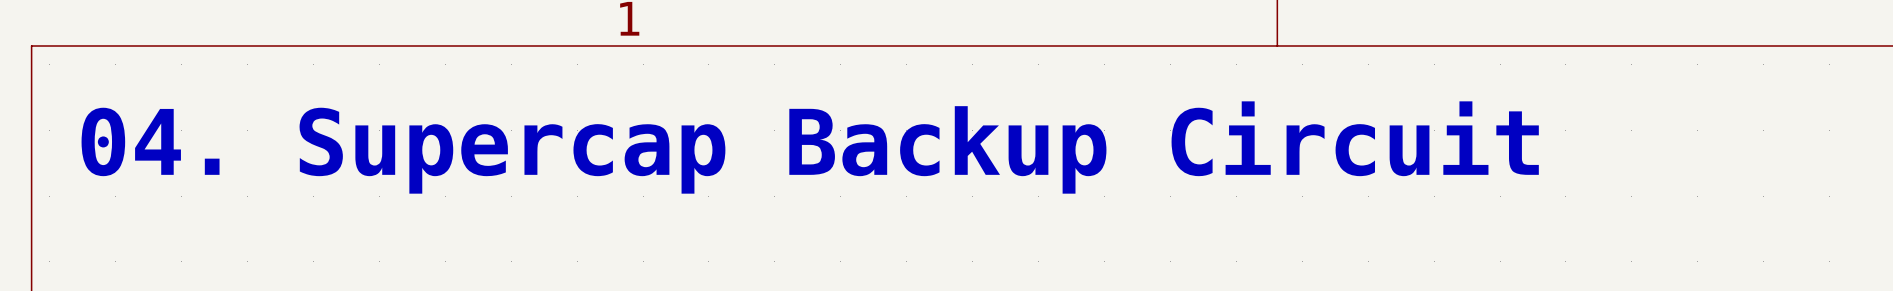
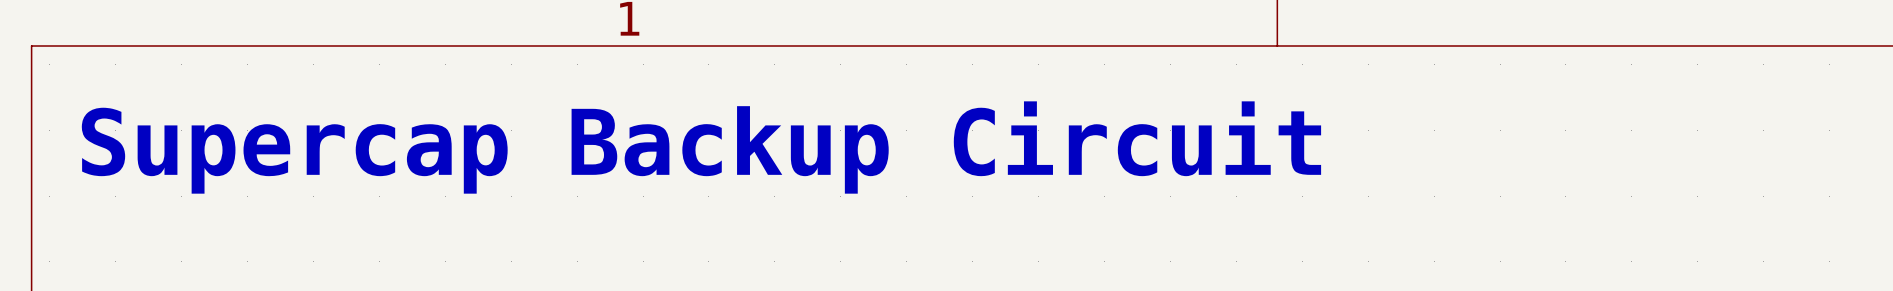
text: 04. Supercap Backup Circuit (810, 147) -> Supercap Backup Circuit (701, 147)

